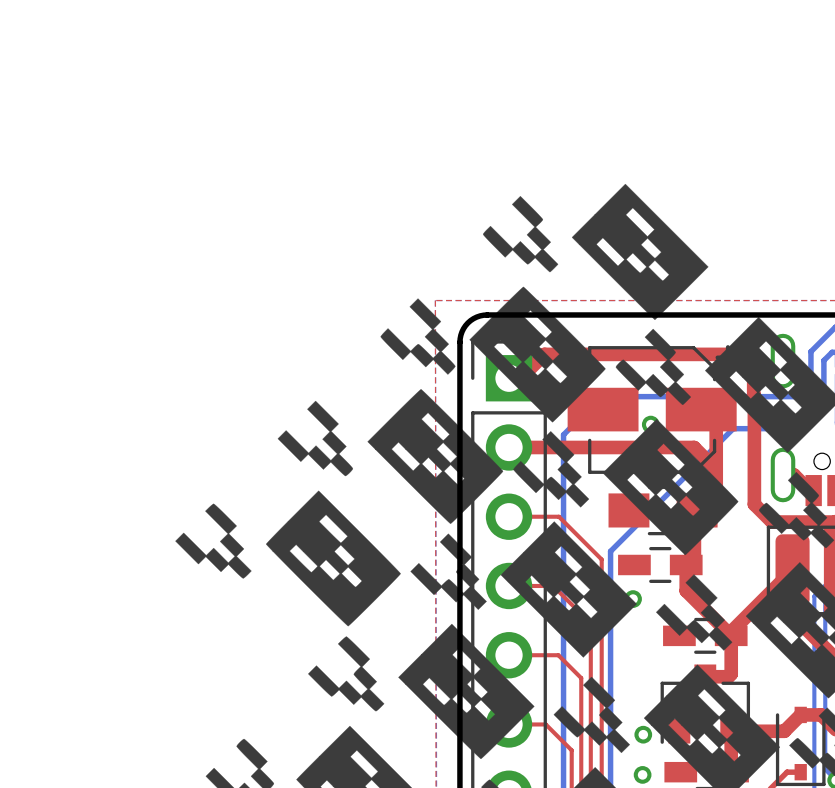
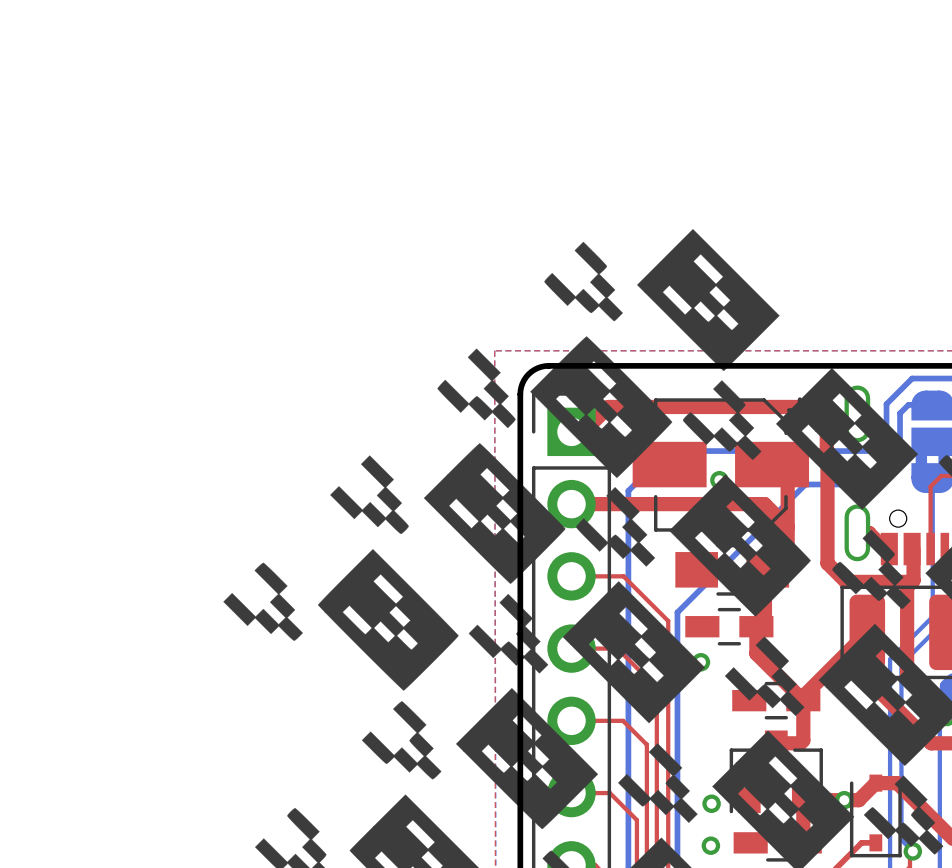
via: none -> (844, 800)

